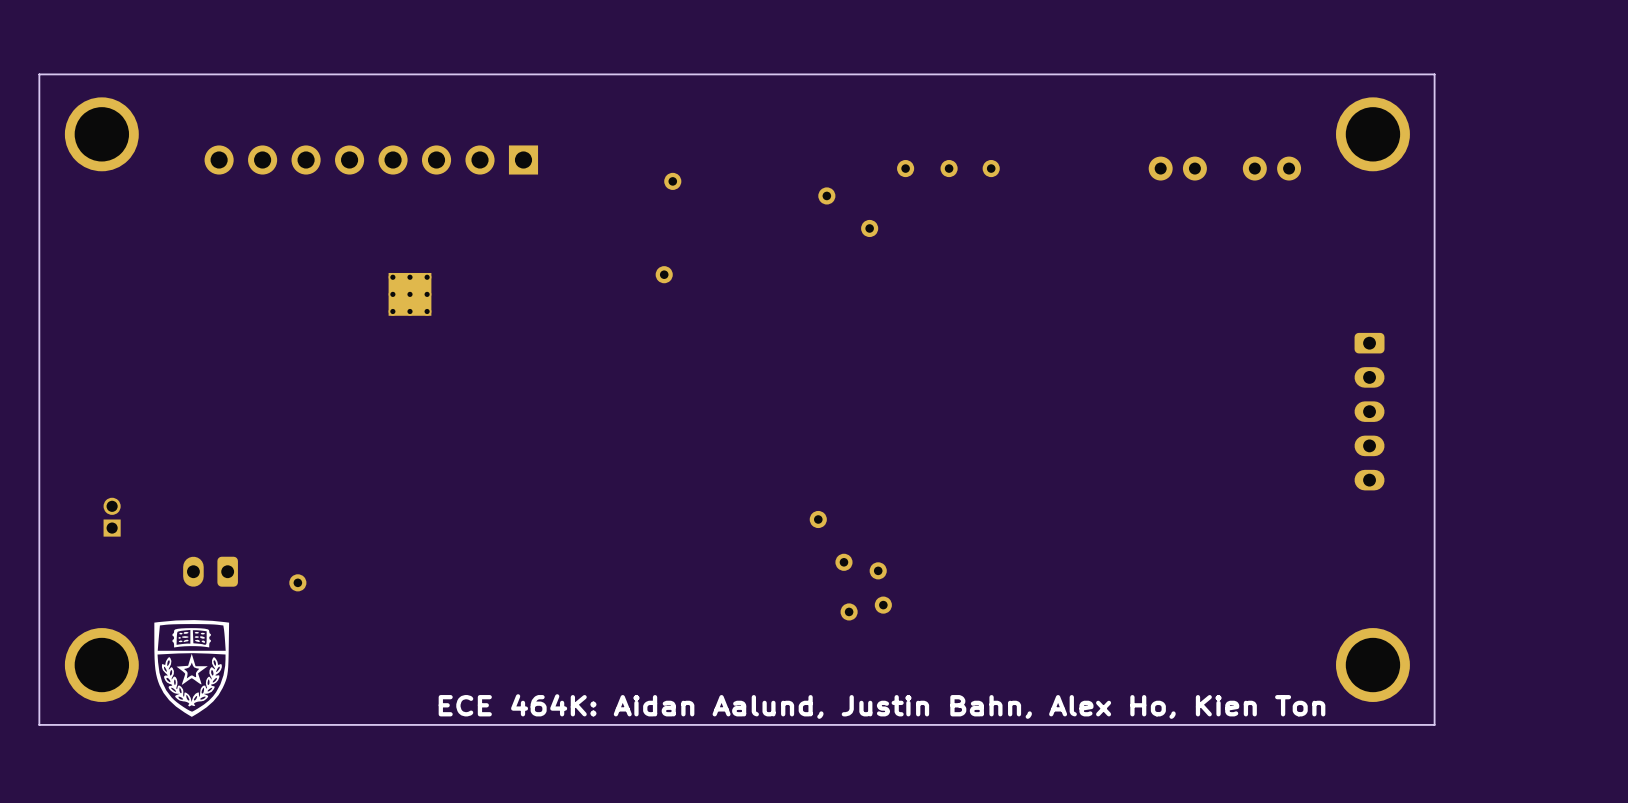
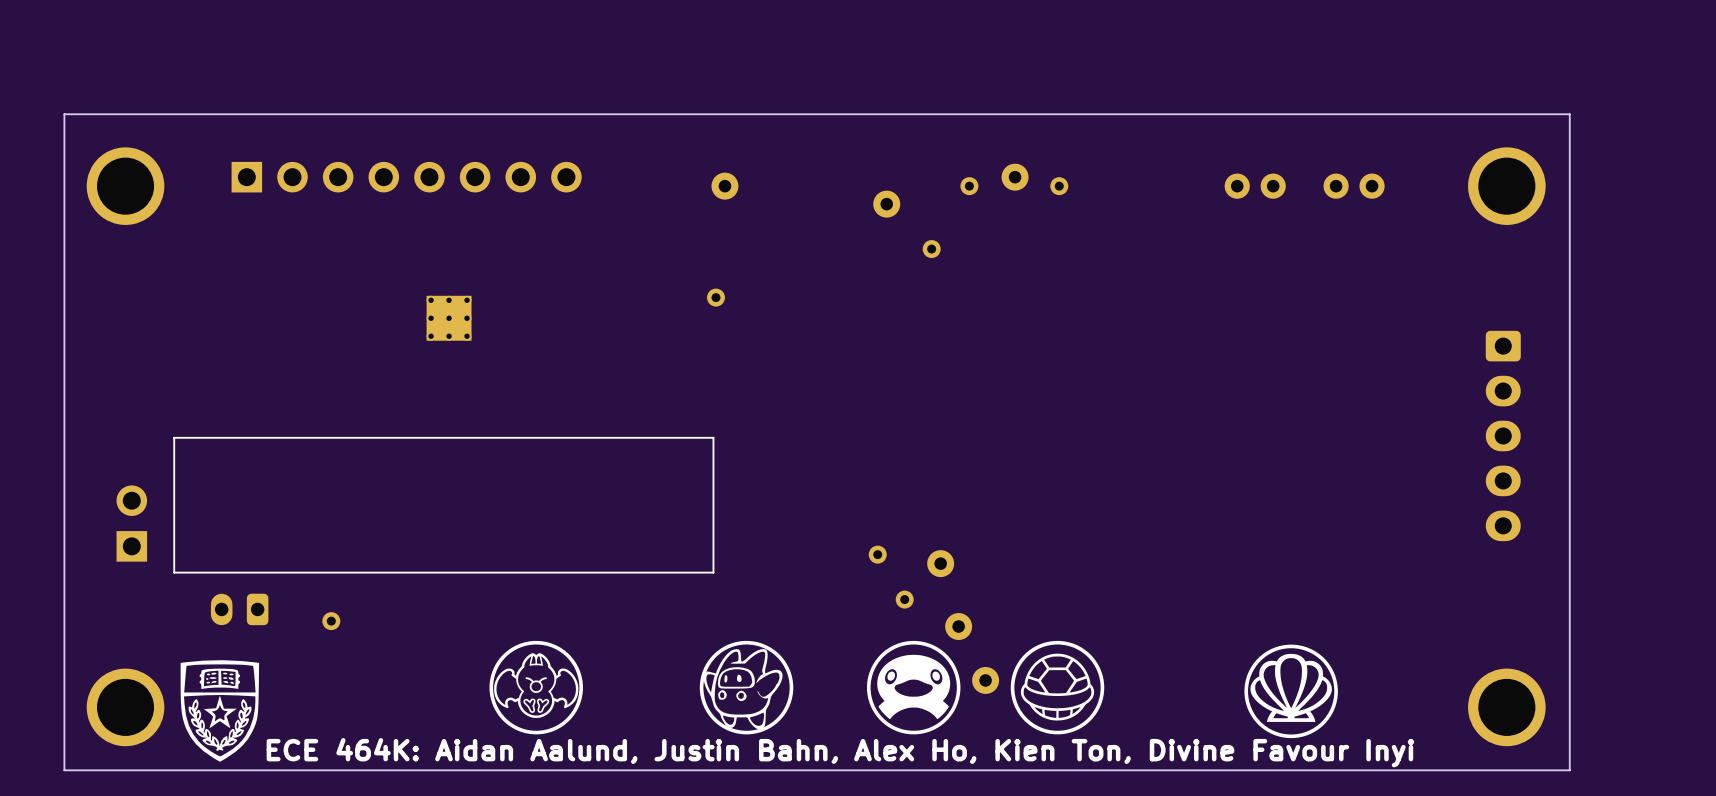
part position: (101, 134) -> (125, 186)
part position: (1372, 134) -> (1506, 186)
part rotation: 0° (371, 159) -> 180° (406, 177)
part footprint: [940, 159, 958, 178] -> [1001, 163, 1029, 191]
part footprint: [664, 172, 682, 190] -> [711, 172, 739, 200]
part footprint: [818, 187, 836, 205] -> [873, 190, 901, 218]
part: none -> (1503, 435)
line: none -> (713, 437) (174, 437) (174, 572) (713, 572) (713, 437)
part: (1369, 411) -> none
part: none -> (131, 523)
part: (112, 517) -> none
part: none -> (940, 563)
part: (878, 570) -> none
part: none -> (958, 626)
drawing: none -> [489, 640, 583, 735]
drawing: none -> [699, 640, 794, 735]
drawing: none -> [866, 640, 961, 735]
drawing: none -> [1010, 640, 1105, 735]
part: (883, 605) -> none
drawing: none -> [1244, 644, 1338, 739]
part: (849, 611) -> none
part: none -> (985, 680)
part position: (1372, 665) -> (1506, 707)
text: ECE 464K: Aidan Aalund, Justin Bahn, Alex Ho, Kien Ton (882, 706) -> ECE 464K: Aidan Aalund, Justin Bahn, Alex Ho, Kien Ton, Divine Favour Inyi (840, 752)
board edge: (1434, 724) (1434, 74) (39, 74) (39, 724) (43, 724) -> (1524, 770) (1569, 770) (1569, 114) (64, 114) (64, 770)

